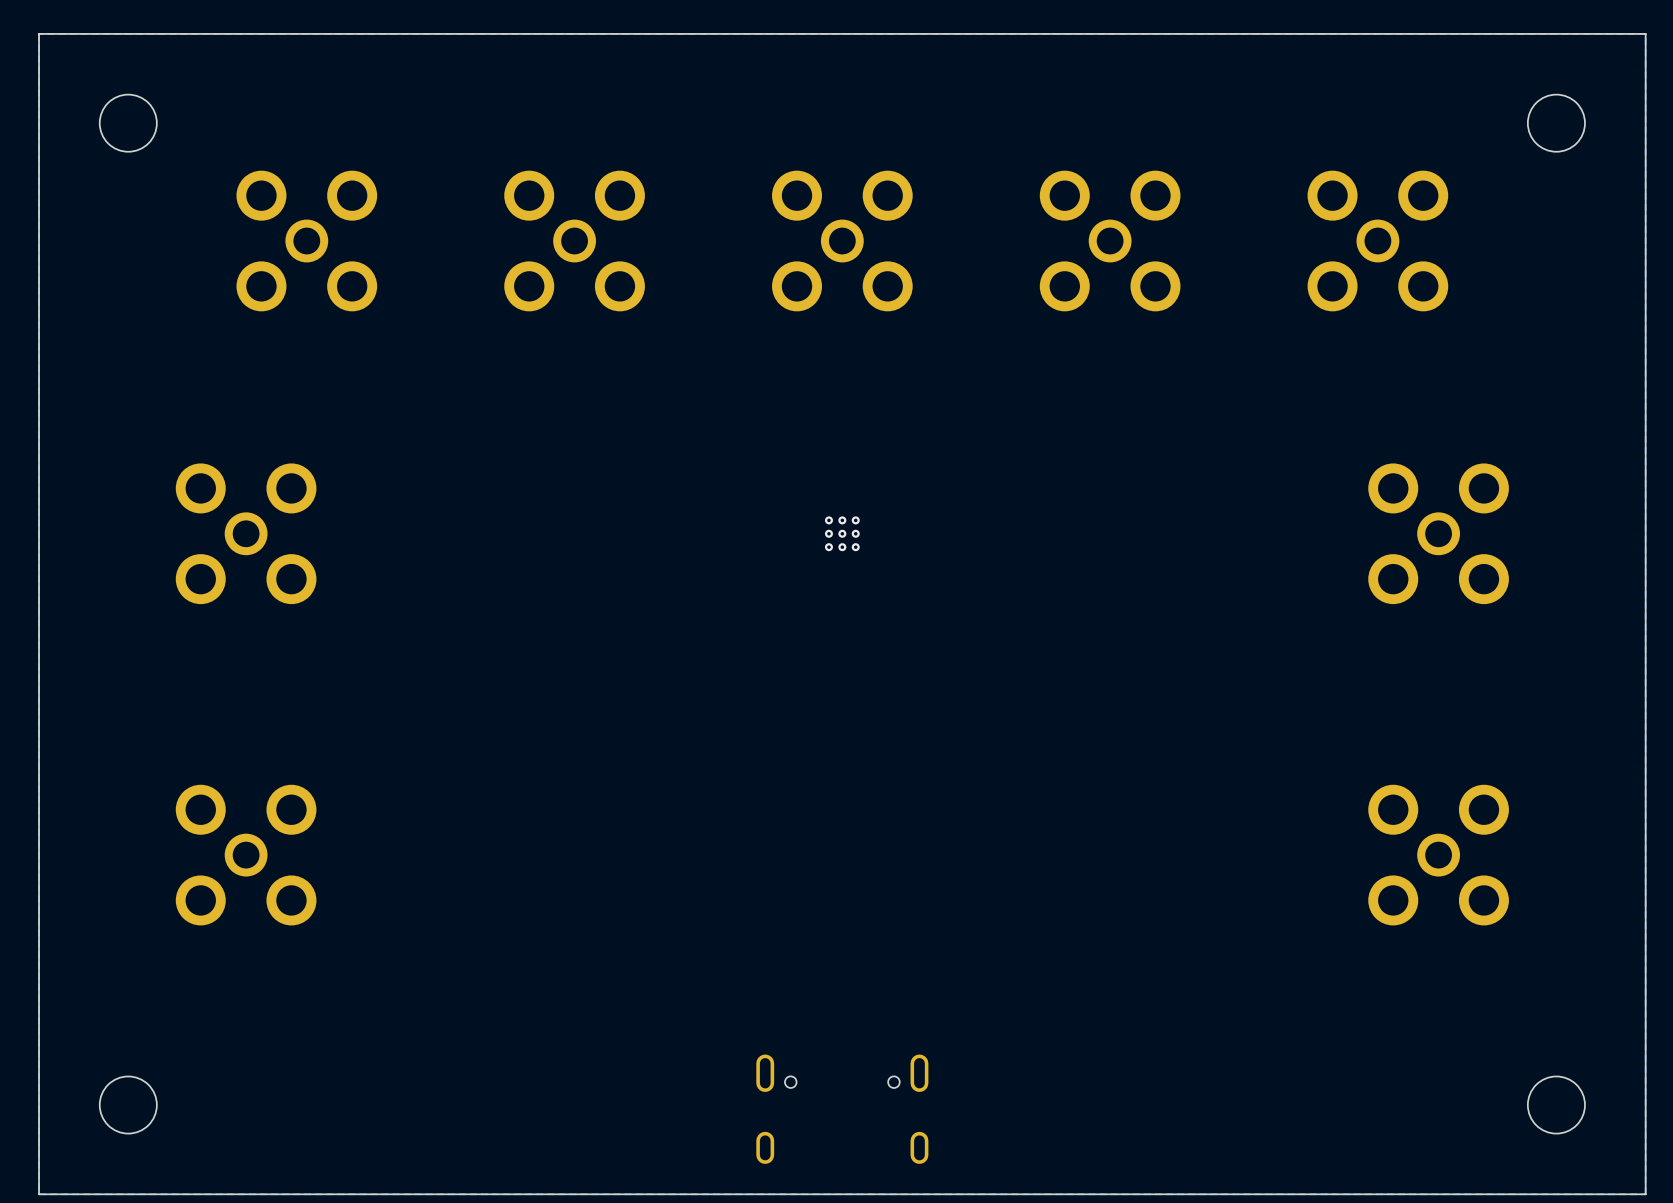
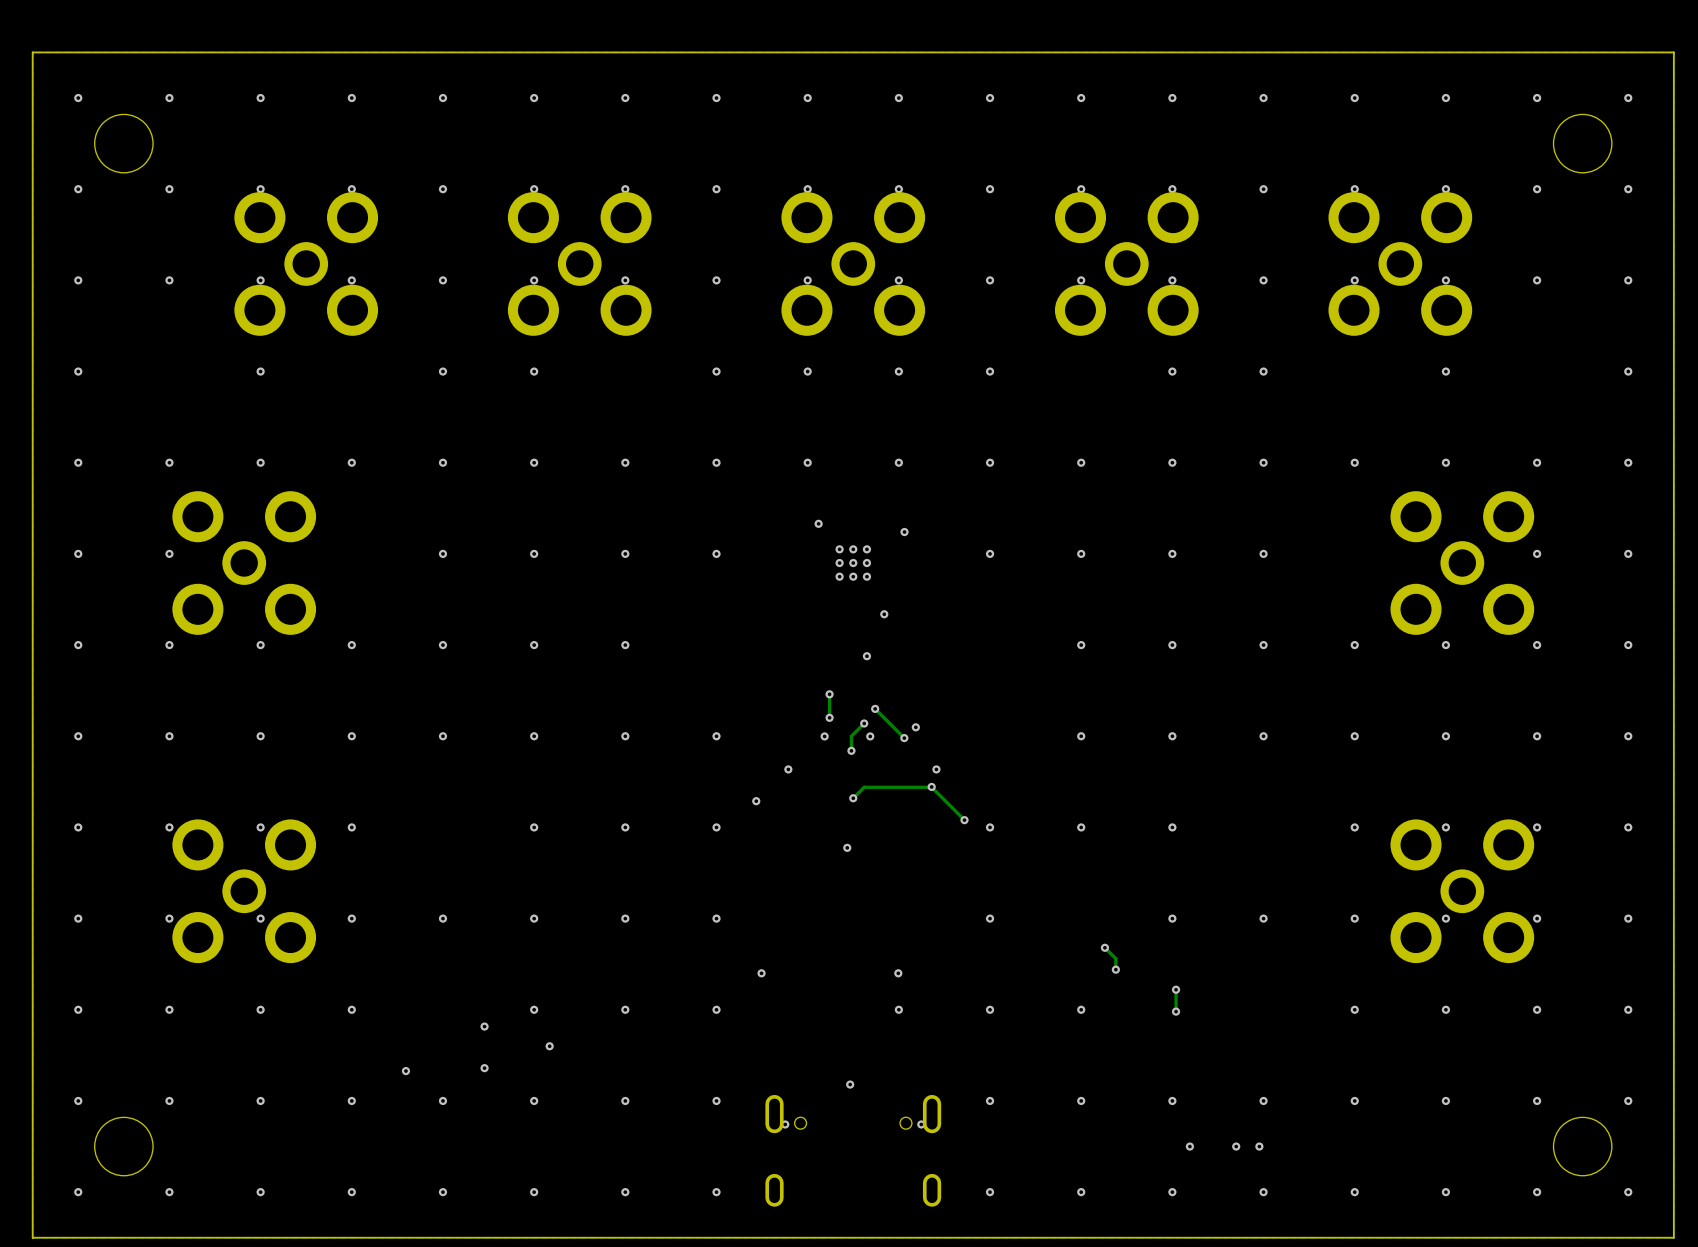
via: none -> (78, 98)
via: none -> (169, 98)
via: none -> (260, 98)
via: none -> (351, 98)
via: none -> (442, 98)
via: none -> (534, 98)
via: none -> (625, 98)
via: none -> (716, 98)
via: none -> (807, 98)
via: none -> (898, 98)
via: none -> (990, 98)
via: none -> (1081, 98)
via: none -> (1172, 98)
via: none -> (1263, 98)
via: none -> (1354, 98)
via: none -> (1445, 98)
via: none -> (1537, 98)
via: none -> (1628, 98)
via: none -> (78, 189)
via: none -> (169, 189)
via: none -> (260, 189)
via: none -> (351, 189)
via: none -> (442, 189)
via: none -> (534, 189)
via: none -> (625, 189)
via: none -> (716, 189)
via: none -> (807, 189)
via: none -> (898, 189)
via: none -> (990, 189)
via: none -> (1081, 189)
via: none -> (1172, 189)
via: none -> (1263, 189)
via: none -> (1354, 189)
via: none -> (1445, 189)
via: none -> (1537, 189)
via: none -> (1628, 189)
via: none -> (78, 280)
via: none -> (169, 280)
via: none -> (260, 280)
via: none -> (351, 280)
via: none -> (442, 280)
via: none -> (534, 280)
via: none -> (625, 280)
via: none -> (716, 280)
via: none -> (807, 280)
via: none -> (898, 280)
via: none -> (990, 280)
via: none -> (1081, 280)
via: none -> (1172, 280)
via: none -> (1263, 280)
via: none -> (1354, 280)
via: none -> (1445, 280)
via: none -> (1537, 280)
via: none -> (1628, 280)
via: none -> (78, 371)
via: none -> (260, 371)
via: none -> (442, 371)
via: none -> (534, 371)
via: none -> (716, 371)
via: none -> (807, 371)
via: none -> (898, 371)
via: none -> (990, 371)
via: none -> (1172, 371)
via: none -> (1263, 371)
via: none -> (1445, 371)
via: none -> (1628, 371)
via: none -> (78, 462)
via: none -> (169, 462)
via: none -> (260, 462)
via: none -> (351, 462)
via: none -> (442, 462)
via: none -> (534, 462)
via: none -> (625, 462)
via: none -> (716, 462)
via: none -> (807, 462)
via: none -> (898, 462)
via: none -> (990, 462)
via: none -> (1081, 462)
via: none -> (1172, 462)
via: none -> (1263, 462)
via: none -> (1354, 462)
via: none -> (1445, 462)
via: none -> (1537, 462)
via: none -> (1628, 462)
via: none -> (818, 523)
via: none -> (904, 532)
via: none -> (78, 553)
via: none -> (169, 553)
via: none -> (442, 553)
via: none -> (534, 553)
via: none -> (625, 553)
via: none -> (716, 553)
via: none -> (990, 553)
via: none -> (1081, 553)
via: none -> (1172, 553)
via: none -> (1263, 553)
via: none -> (1537, 553)
via: none -> (1628, 553)
via: none -> (884, 614)
via: none -> (78, 645)
via: none -> (169, 645)
via: none -> (260, 645)
via: none -> (351, 645)
via: none -> (442, 645)
via: none -> (534, 645)
via: none -> (625, 645)
via: none -> (1081, 645)
via: none -> (1172, 645)
via: none -> (1263, 645)
via: none -> (1354, 645)
via: none -> (1445, 645)
via: none -> (1537, 645)
via: none -> (1628, 645)
via: none -> (866, 656)
track: none -> (829, 694) (829, 718)
via: none -> (829, 694)
track: none -> (875, 708) (904, 738)
via: none -> (875, 708)
via: none -> (829, 717)
track: none -> (864, 723) (851, 736) (851, 750)
via: none -> (864, 723)
via: none -> (915, 727)
via: none -> (78, 736)
via: none -> (169, 736)
via: none -> (260, 736)
via: none -> (351, 736)
via: none -> (442, 736)
via: none -> (534, 736)
via: none -> (625, 736)
via: none -> (716, 736)
via: none -> (824, 736)
via: none -> (870, 736)
via: none -> (1081, 736)
via: none -> (1172, 736)
via: none -> (1263, 736)
via: none -> (1354, 736)
via: none -> (1445, 736)
via: none -> (1537, 736)
via: none -> (1628, 736)
via: none -> (904, 738)
via: none -> (851, 750)
via: none -> (788, 769)
via: none -> (936, 769)
via: none -> (931, 786)
track: none -> (853, 798) (864, 787) (931, 787) (964, 820)
via: none -> (853, 798)
via: none -> (756, 801)
via: none -> (964, 820)
via: none -> (78, 827)
via: none -> (169, 827)
via: none -> (260, 827)
via: none -> (351, 827)
via: none -> (534, 827)
via: none -> (625, 827)
via: none -> (716, 827)
via: none -> (990, 827)
via: none -> (1081, 827)
via: none -> (1172, 827)
via: none -> (1354, 827)
via: none -> (1445, 827)
via: none -> (1537, 827)
via: none -> (1628, 827)
via: none -> (847, 847)
via: none -> (78, 918)
via: none -> (169, 918)
via: none -> (260, 918)
via: none -> (351, 918)
via: none -> (442, 918)
via: none -> (534, 918)
via: none -> (625, 918)
via: none -> (716, 918)
via: none -> (990, 918)
via: none -> (1172, 918)
via: none -> (1263, 918)
via: none -> (1354, 918)
via: none -> (1445, 918)
via: none -> (1537, 918)
via: none -> (1628, 918)
track: none -> (1104, 947) (1115, 958) (1115, 969)
via: none -> (1104, 947)
via: none -> (1115, 969)
via: none -> (761, 973)
via: none -> (898, 973)
track: none -> (1176, 989) (1176, 1011)
via: none -> (1176, 989)
via: none -> (78, 1009)
via: none -> (169, 1009)
via: none -> (260, 1009)
via: none -> (351, 1009)
via: none -> (534, 1009)
via: none -> (625, 1009)
via: none -> (716, 1009)
via: none -> (898, 1009)
via: none -> (990, 1009)
via: none -> (1081, 1009)
via: none -> (1354, 1009)
via: none -> (1445, 1009)
via: none -> (1537, 1009)
via: none -> (1628, 1009)
via: none -> (1176, 1011)
via: none -> (484, 1026)
via: none -> (549, 1046)
via: none -> (484, 1068)
via: none -> (405, 1071)
via: none -> (850, 1084)
via: none -> (78, 1100)
via: none -> (169, 1100)
via: none -> (260, 1100)
via: none -> (351, 1100)
via: none -> (442, 1100)
via: none -> (534, 1100)
via: none -> (625, 1100)
via: none -> (716, 1100)
via: none -> (990, 1100)
via: none -> (1081, 1100)
via: none -> (1172, 1100)
via: none -> (1263, 1100)
via: none -> (1354, 1100)
via: none -> (1445, 1100)
via: none -> (1537, 1100)
via: none -> (1628, 1100)
via: none -> (785, 1124)
via: none -> (921, 1124)
via: none -> (1189, 1146)
via: none -> (1236, 1146)
via: none -> (1259, 1146)
via: none -> (78, 1192)
via: none -> (169, 1192)
via: none -> (260, 1192)
via: none -> (351, 1192)
via: none -> (442, 1192)
via: none -> (534, 1192)
via: none -> (625, 1192)
via: none -> (716, 1192)
via: none -> (990, 1192)
via: none -> (1081, 1192)
via: none -> (1172, 1192)
via: none -> (1263, 1192)
via: none -> (1354, 1192)
via: none -> (1445, 1192)
via: none -> (1537, 1192)
via: none -> (1628, 1192)

